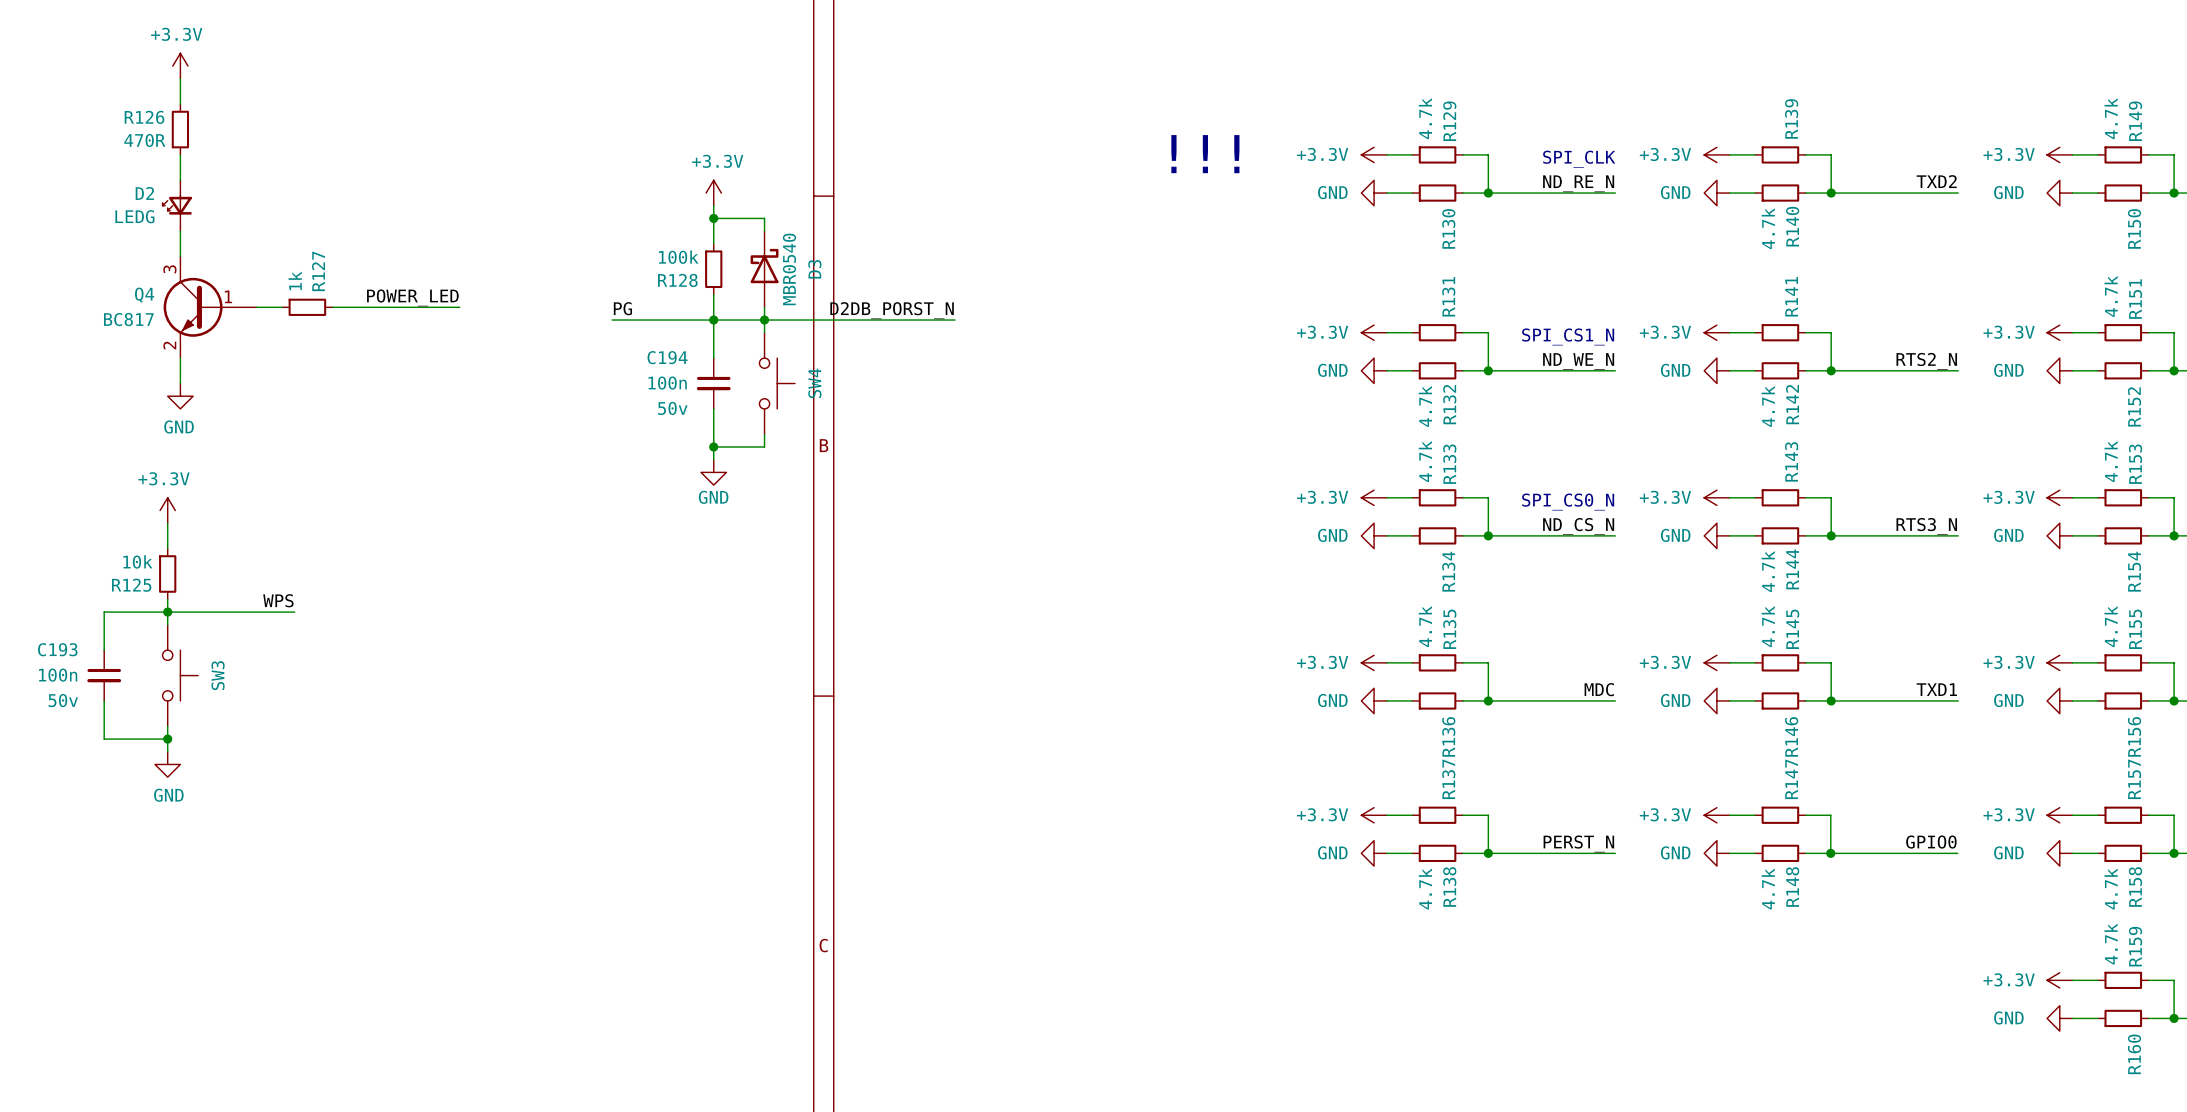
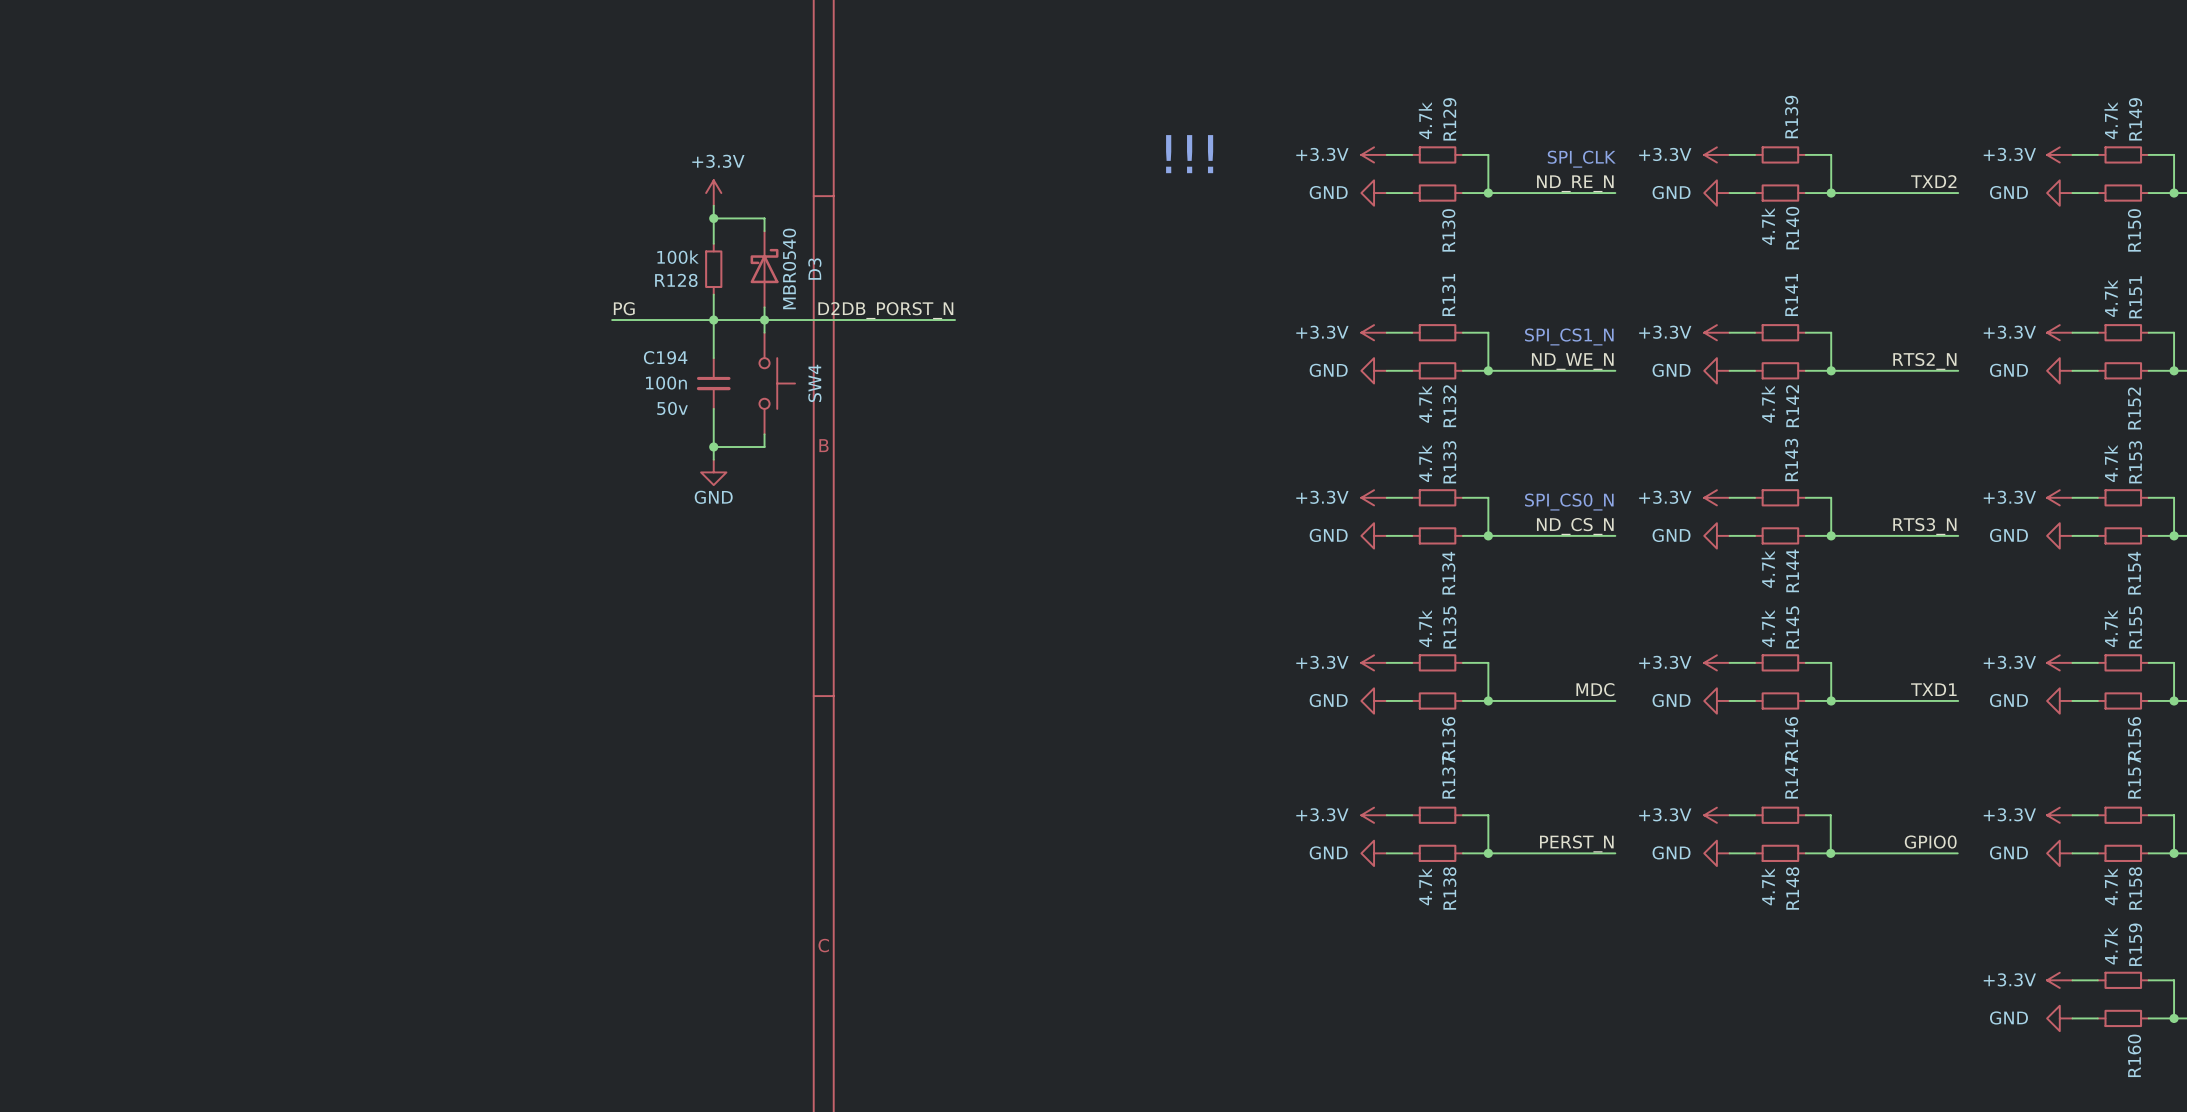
power symbol: +3.3V (180, 66) -> none
wire: (180, 78) (180, 104) -> none
R126: 470R (180, 129) -> none
wire: (180, 154) (180, 180) -> none
D2: LEDG (177, 205) -> none
wire: (180, 231) (180, 256) -> none
label: POWER_LED (412, 297) -> none
Q4: BC817 (210, 307) -> none
wire: (256, 307) (281, 307) -> none
R127: 1k (307, 307) -> none
wire: (332, 307) (459, 307) -> none
wire: (180, 358) (180, 383) -> none
power symbol: GND (180, 396) -> none
power symbol: +3.3V (167, 510) -> none
wire: (167, 523) (167, 548) -> none
R125: 10k (167, 573) -> none
wire: (167, 599) (167, 624) -> none
label: WPS (278, 600) -> none
junction: (167, 612) -> none
wire: (294, 612) (104, 612) (104, 650) -> none
C193: 100n (104, 675) -> none
SW3: (180, 675) -> none
wire: (104, 700) (104, 739) (167, 739) -> none
wire: (167, 726) (167, 751) -> none
junction: (167, 739) -> none
power symbol: GND (167, 764) -> none

